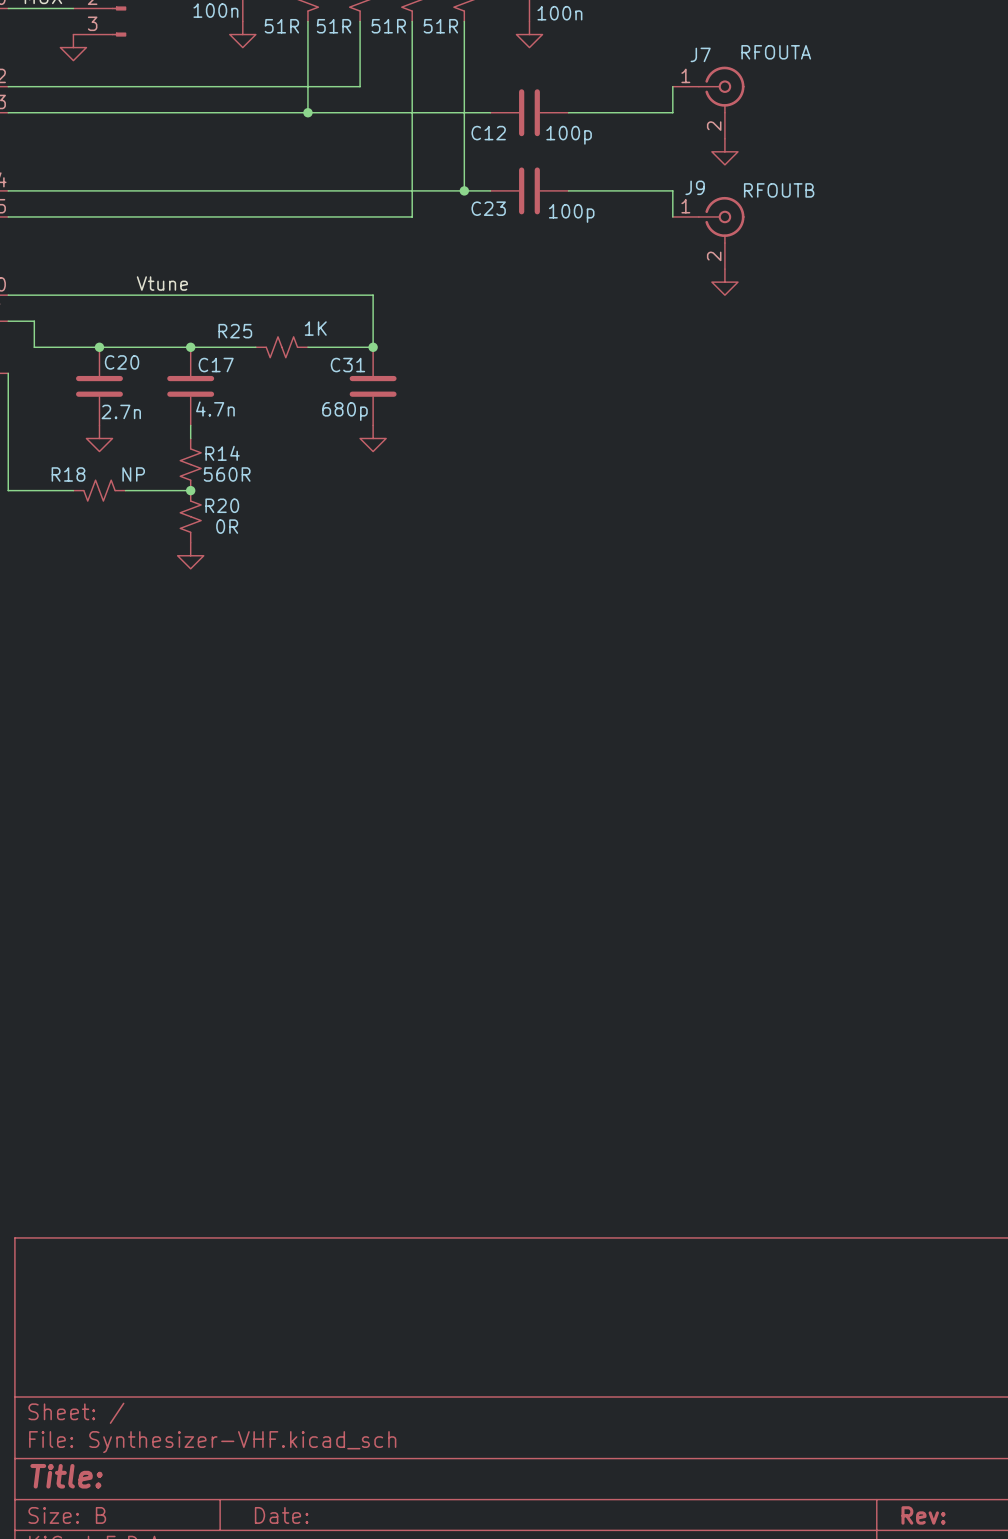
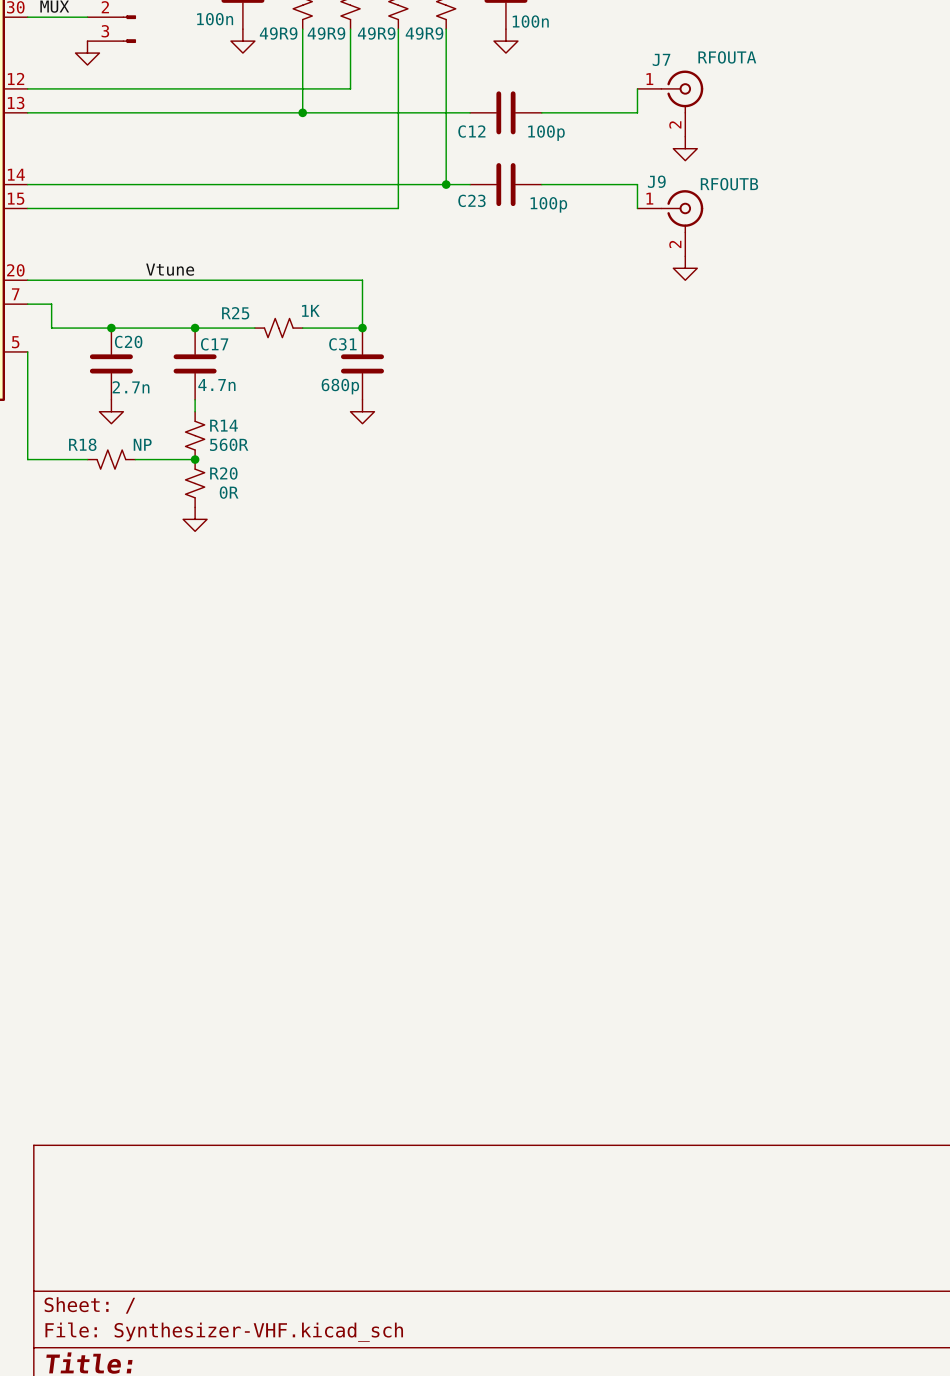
part value: 51R (281, 26) -> 49R9 (278, 33)
part value: 51R (334, 26) -> 49R9 (326, 33)
part value: 51R (388, 26) -> 49R9 (376, 33)
part value: 51R (440, 26) -> 49R9 (424, 33)

